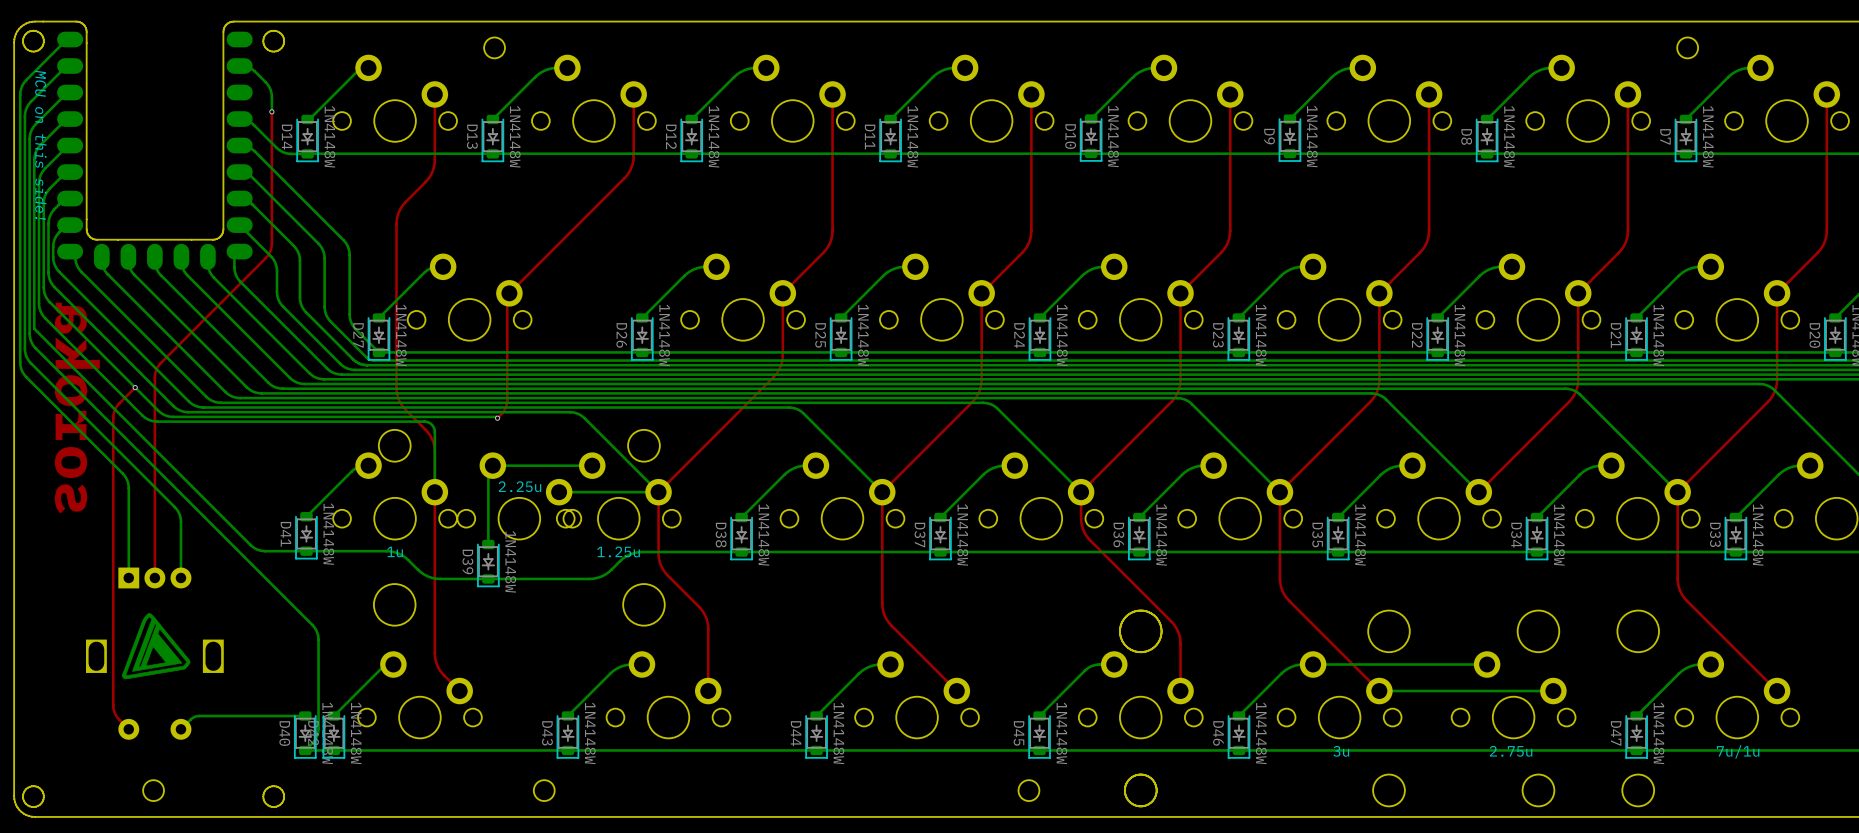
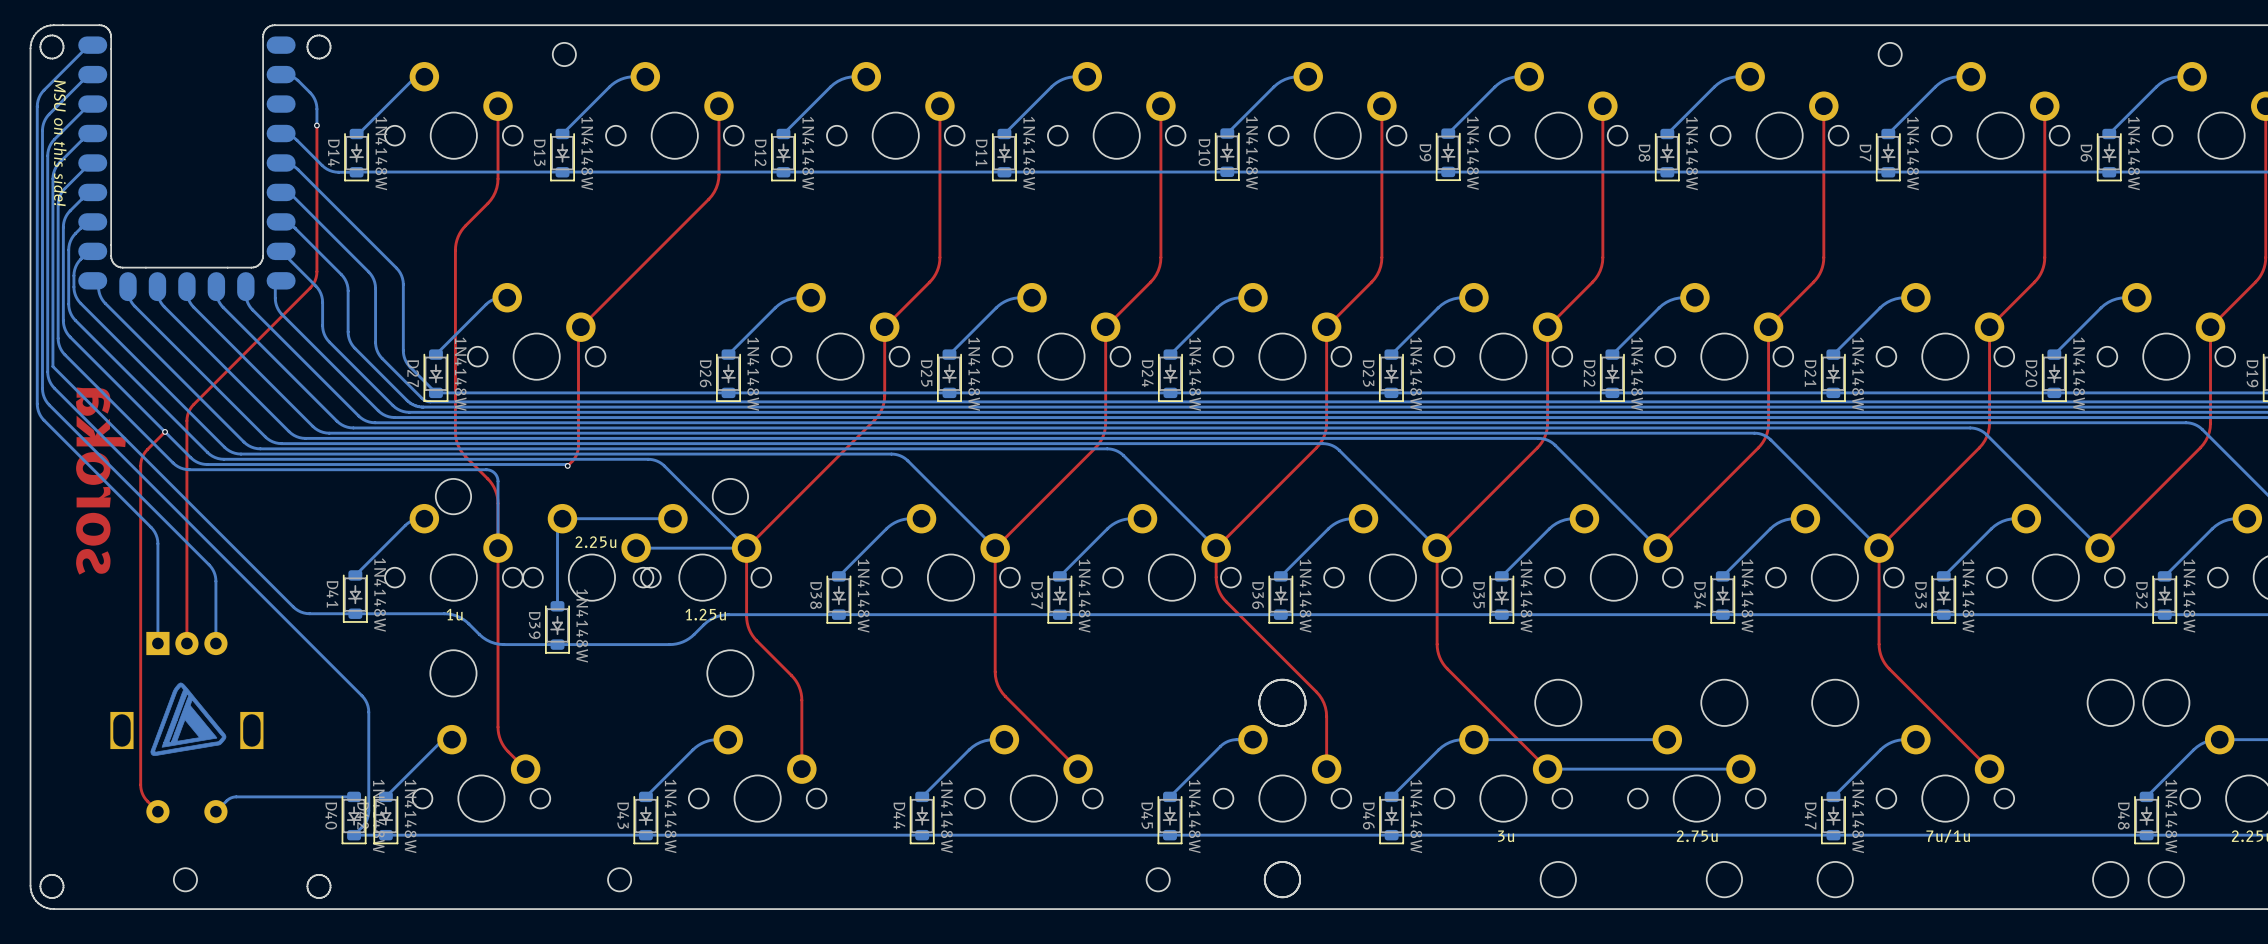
text: MCU on this side! (40, 145) -> MSU on this side! (60, 143)

